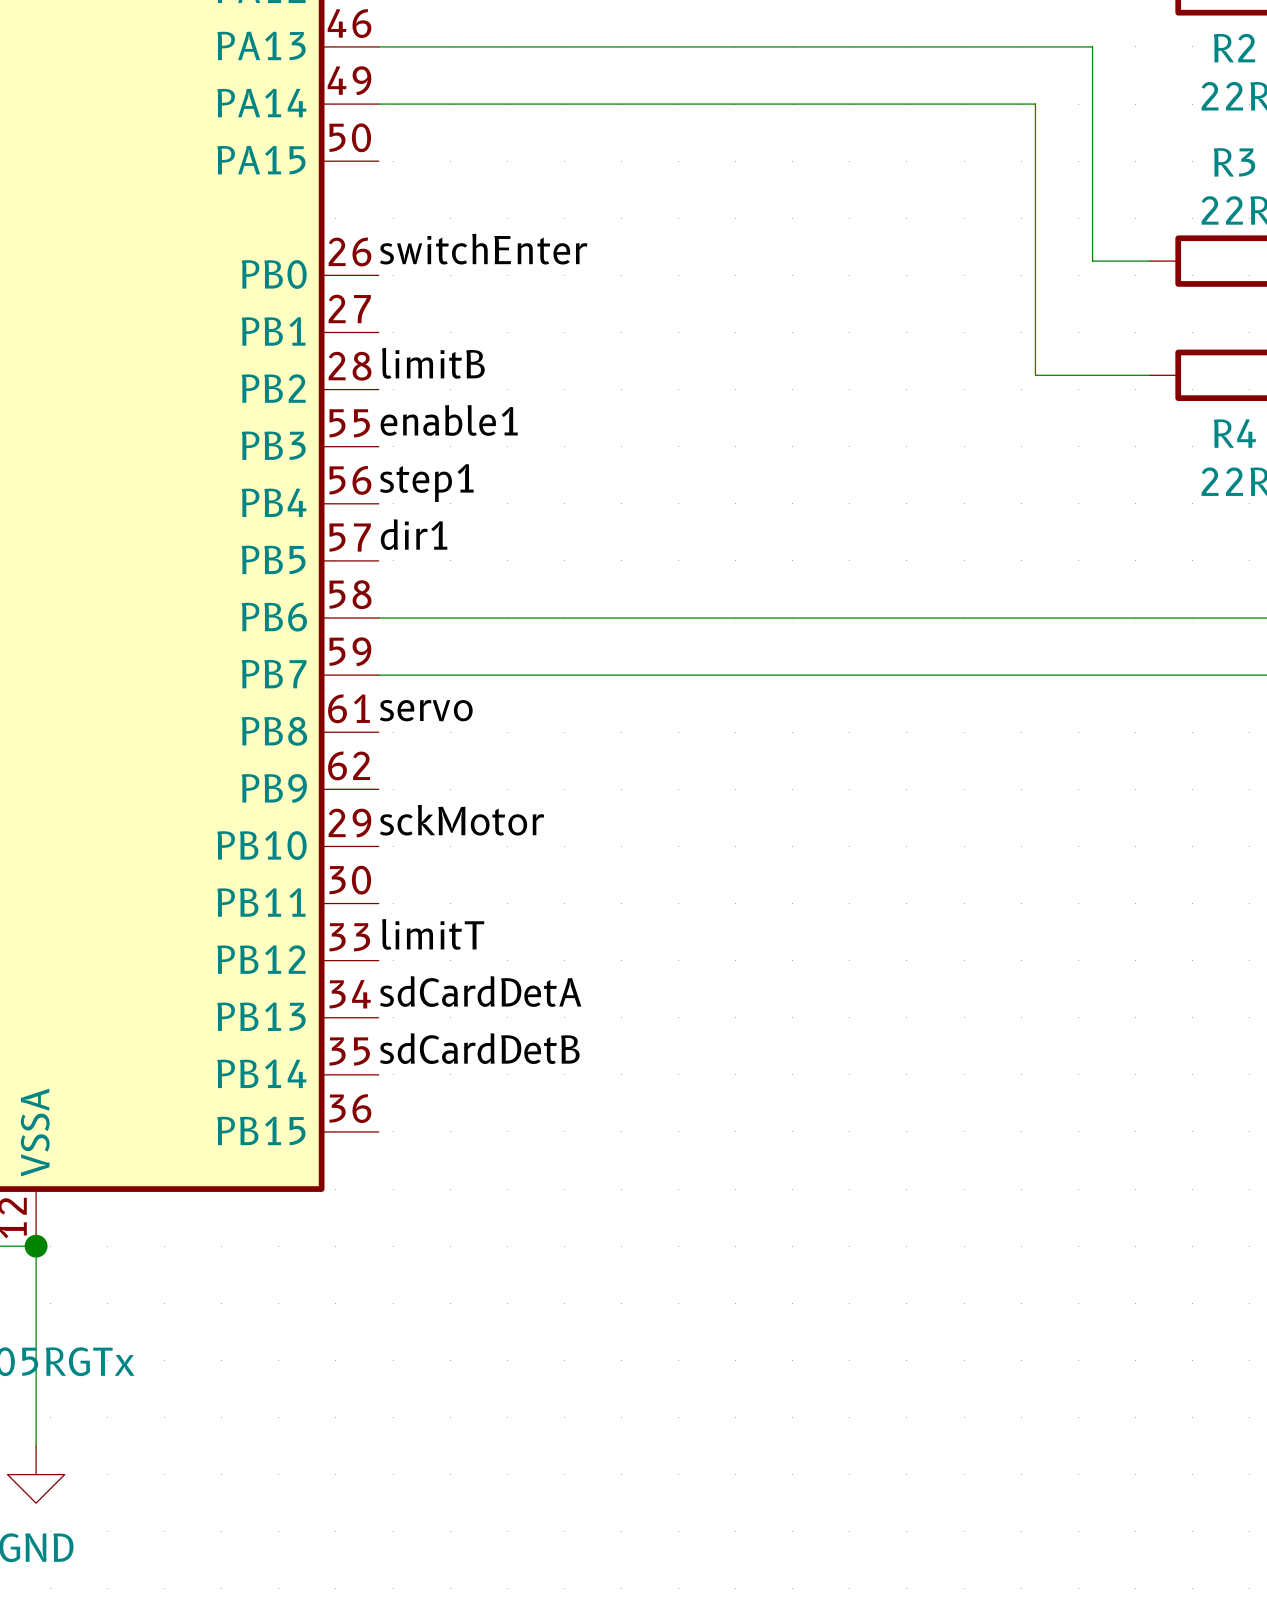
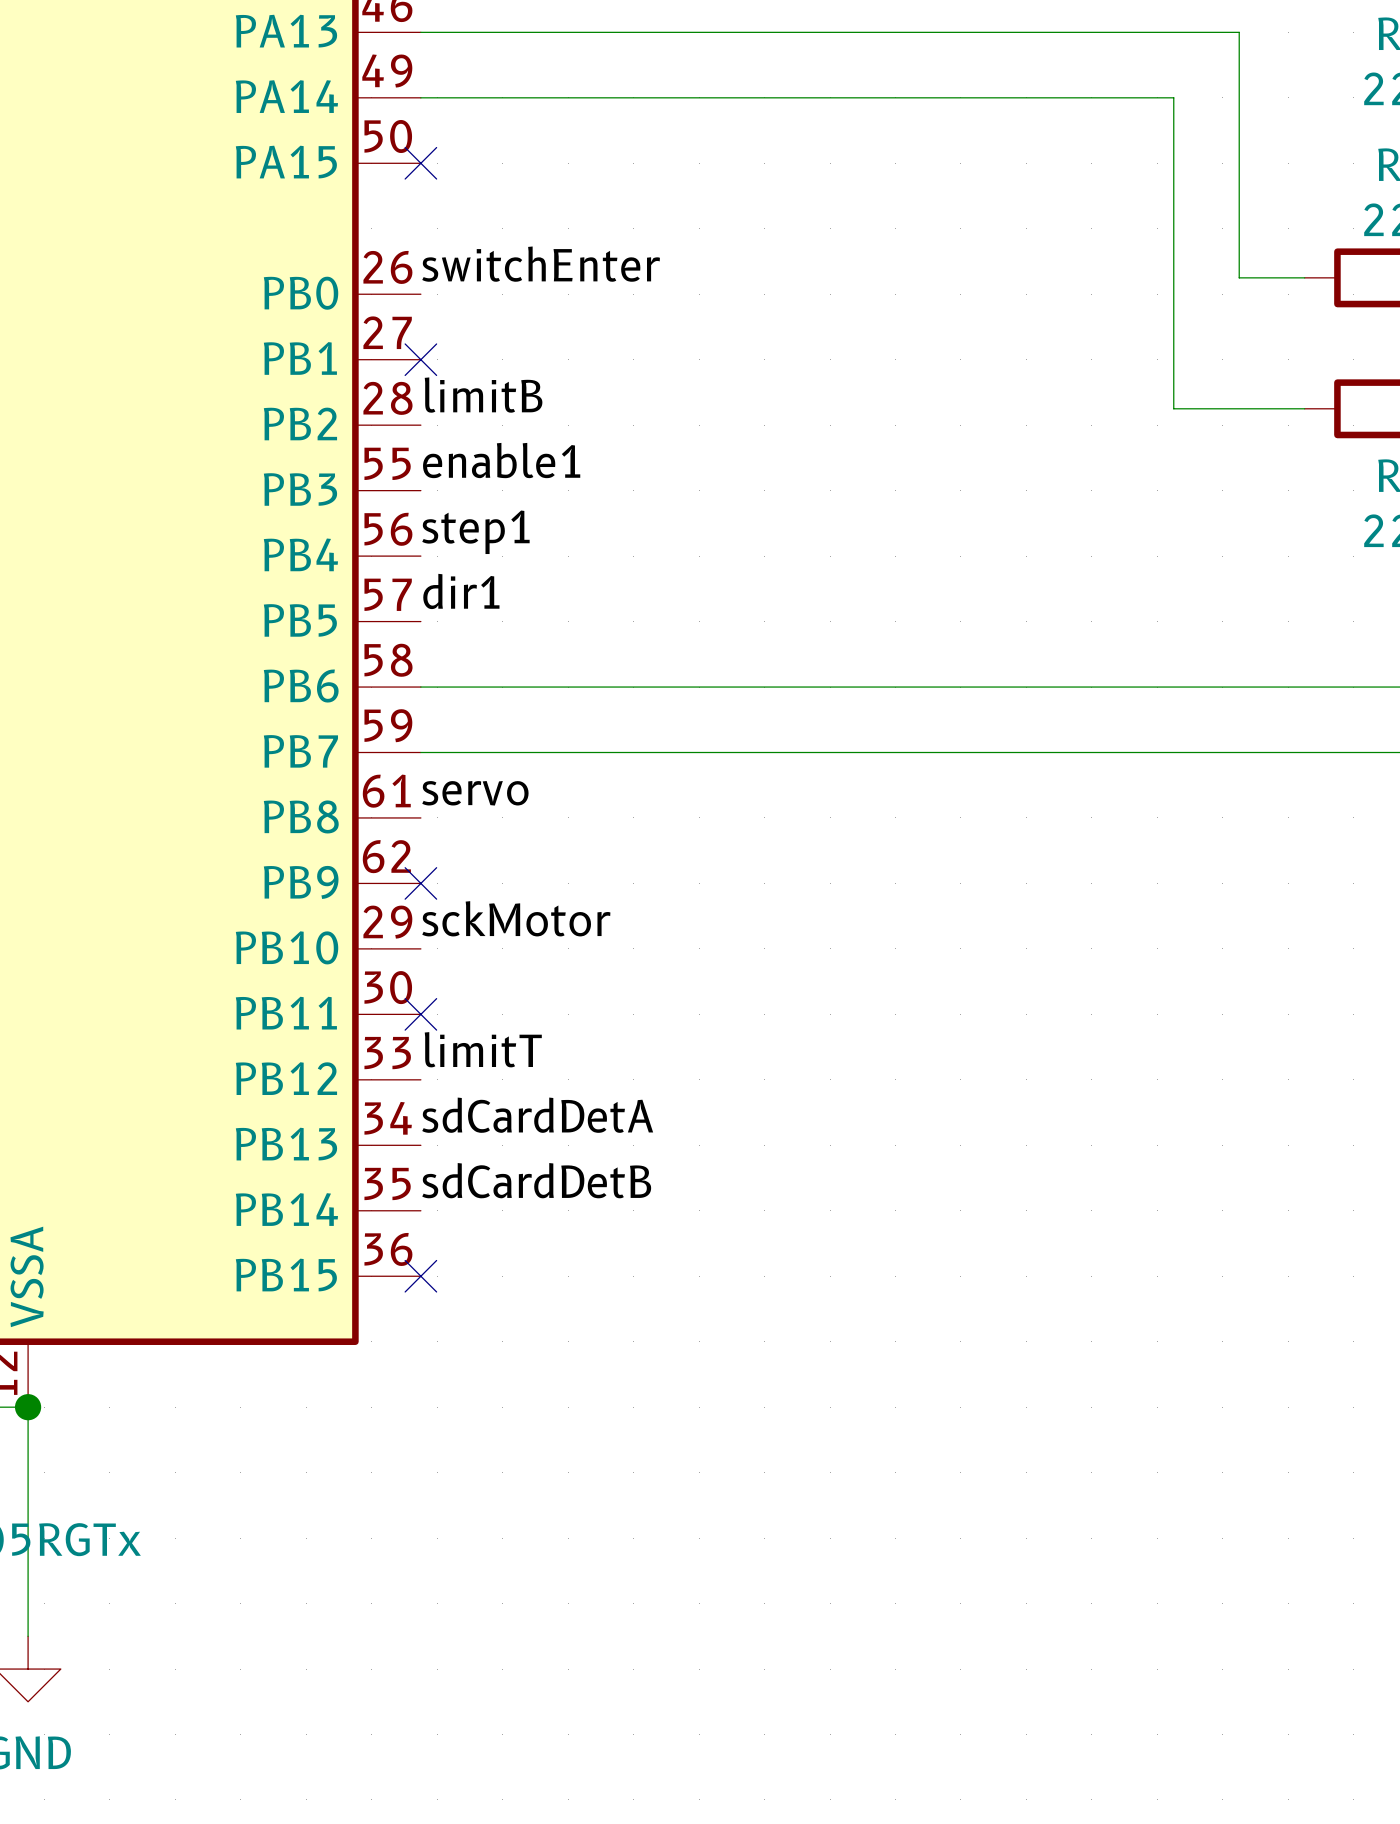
no-connect mark: none -> (420, 163)
no-connect mark: none -> (420, 359)
no-connect mark: none -> (420, 883)
no-connect mark: none -> (420, 1014)
no-connect mark: none -> (420, 1276)

